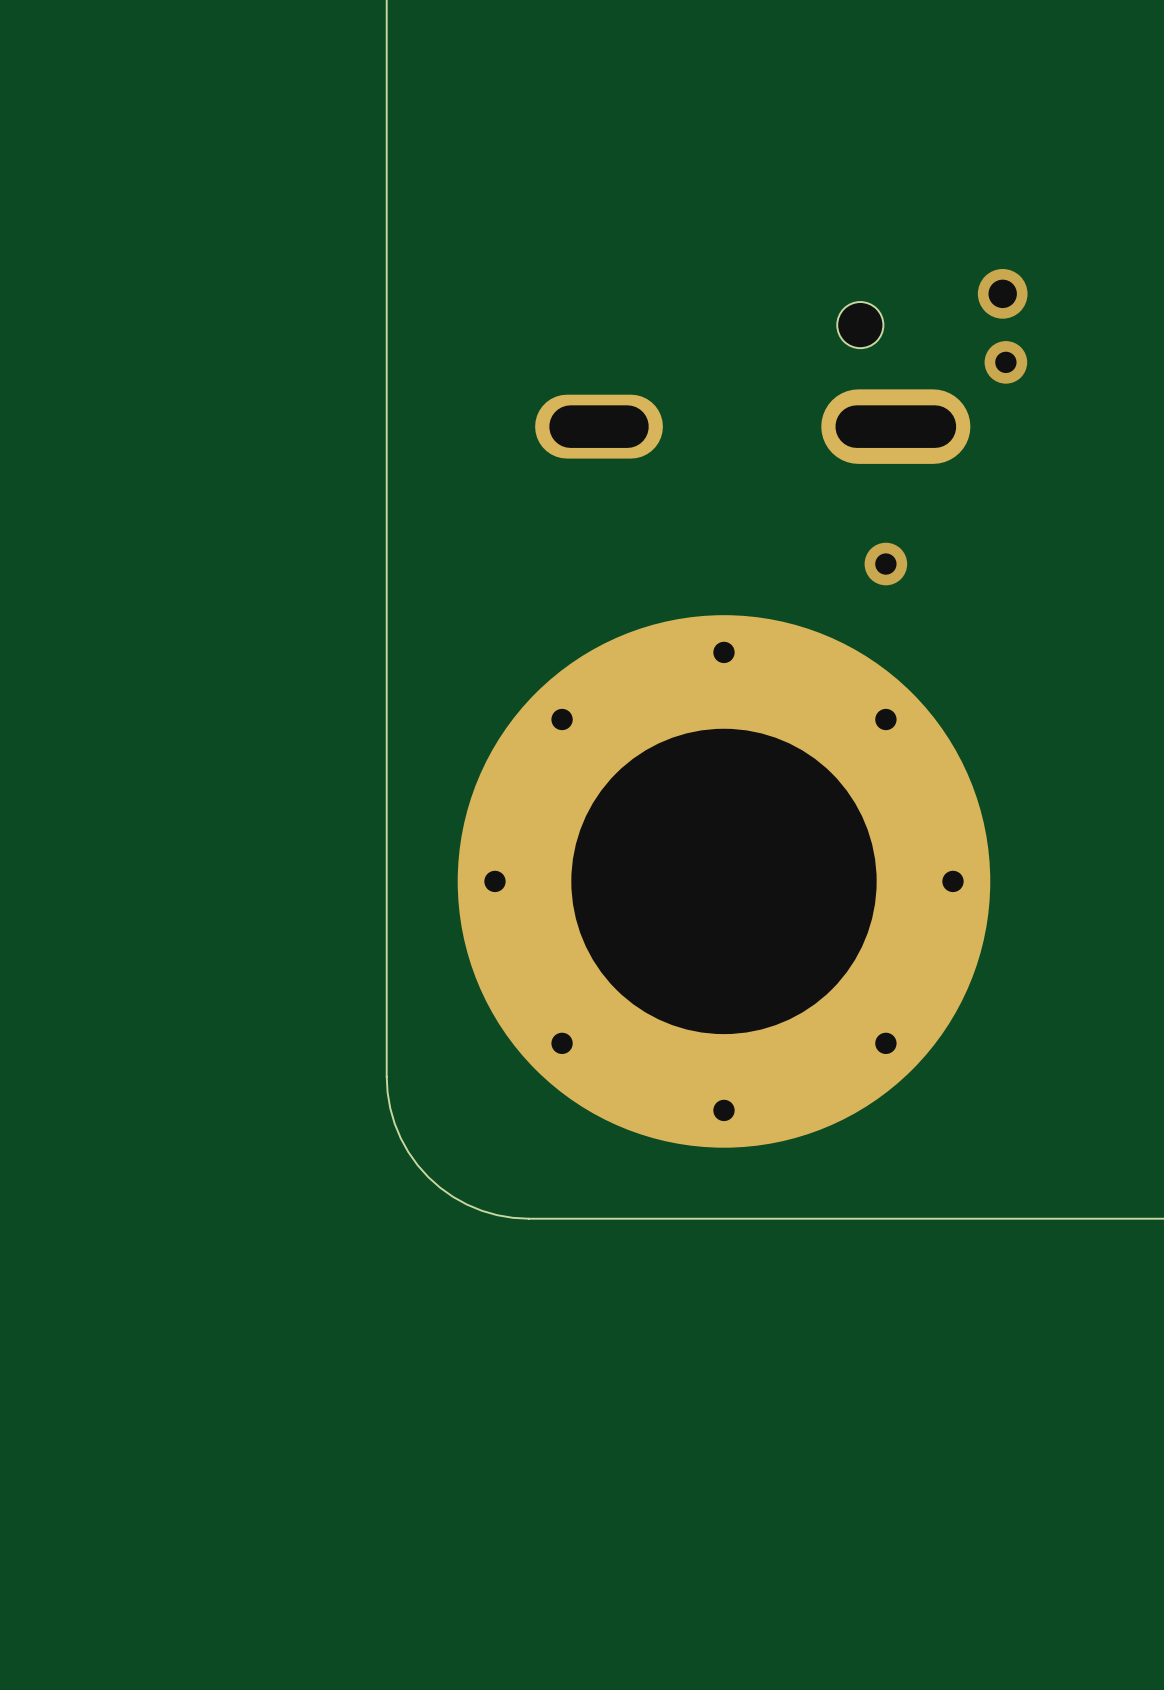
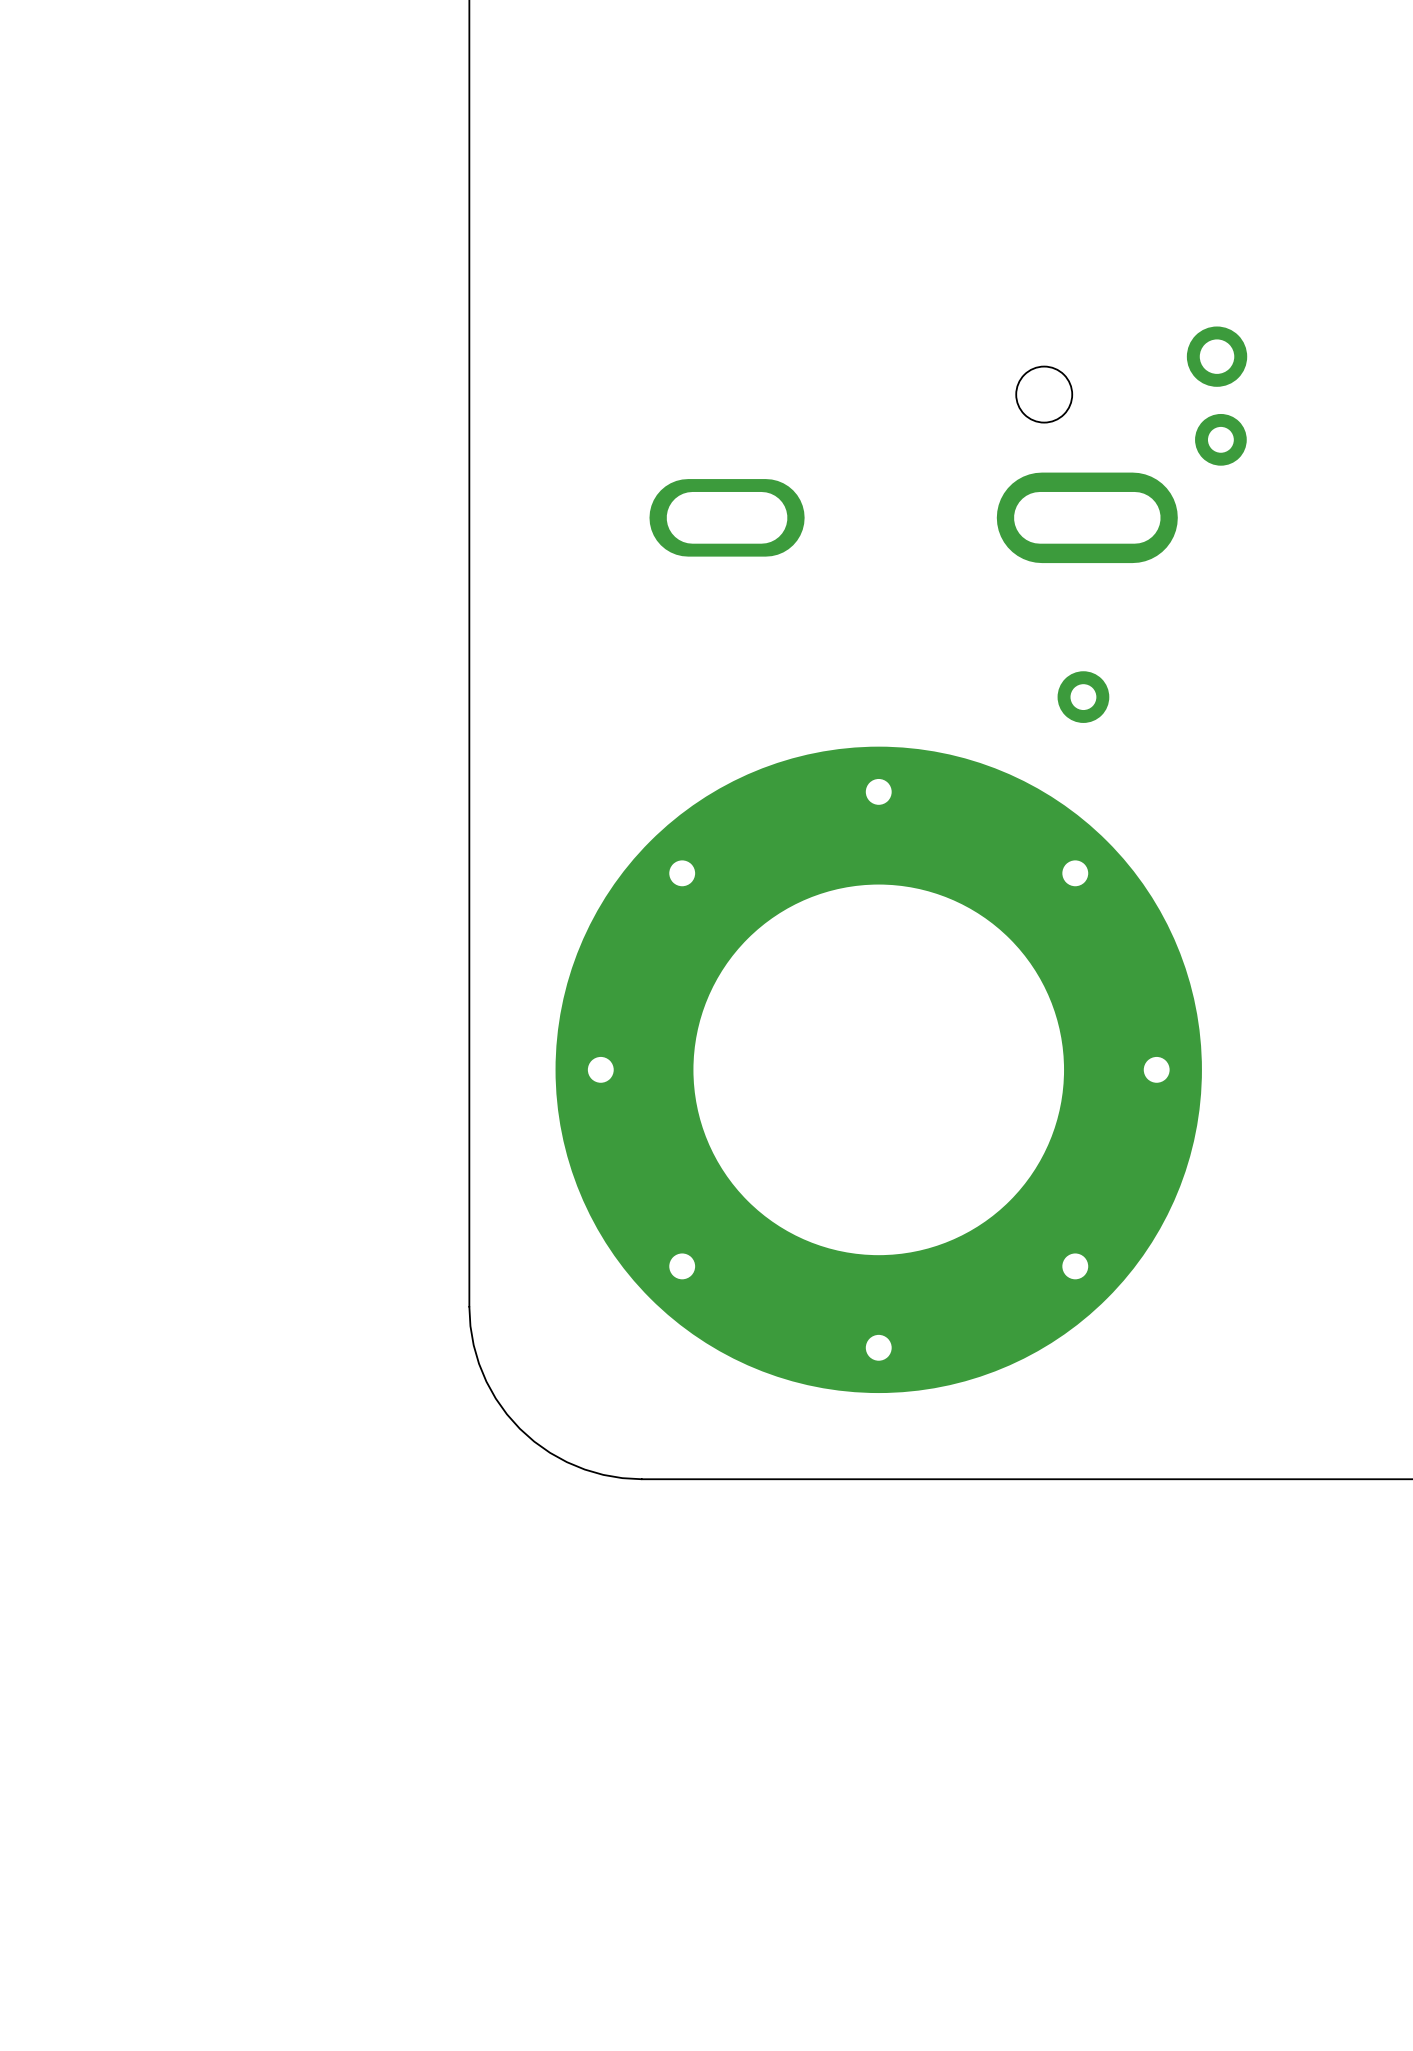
via position: (885, 564) -> (1083, 697)

